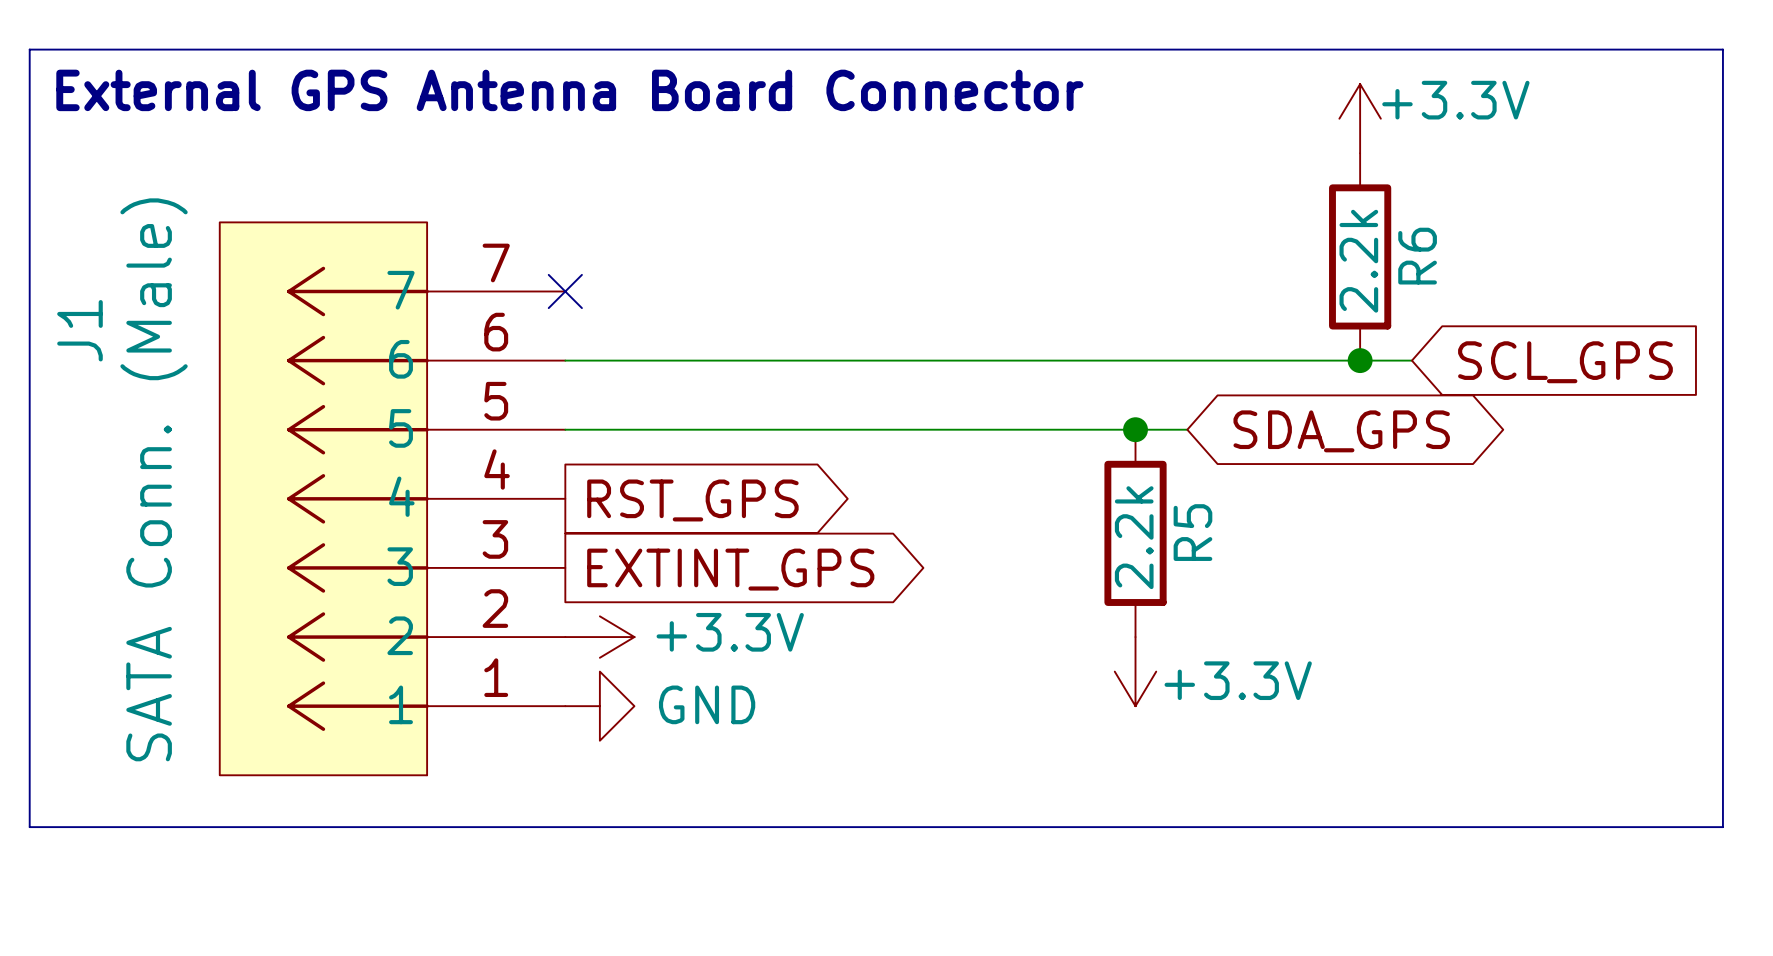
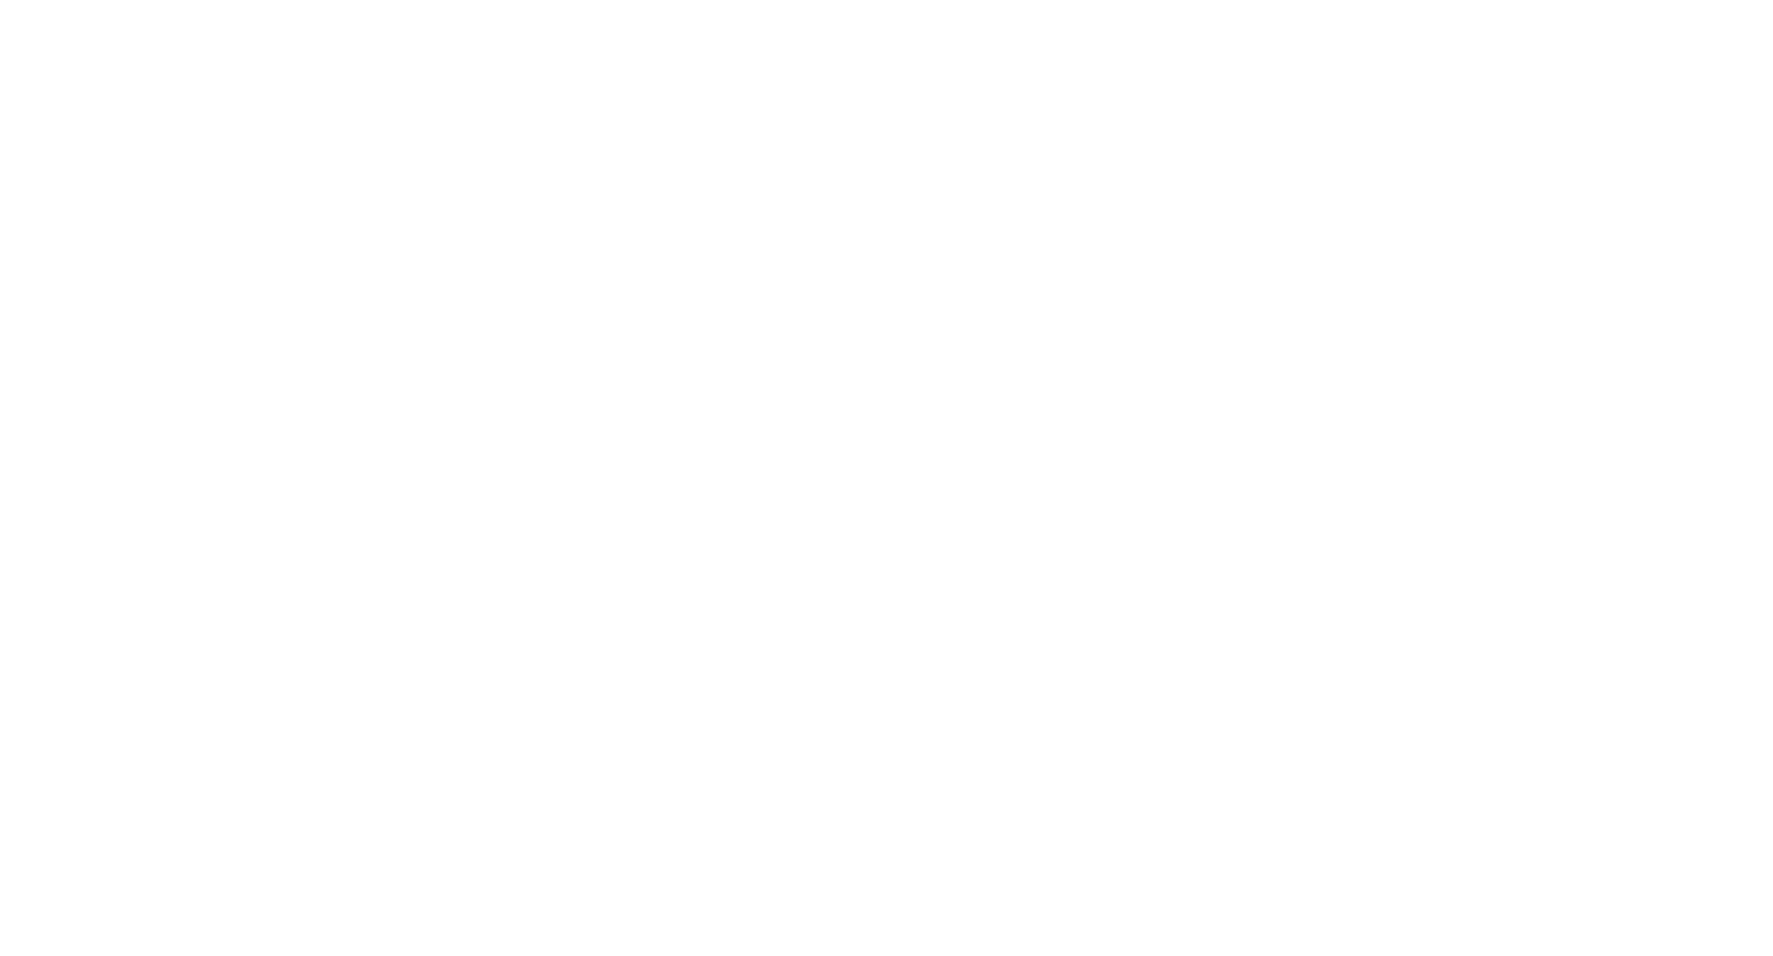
line: (29, 49) (29, 827) (1722, 827) (1722, 49) (29, 49) -> none
text: External GPS Antenna Board Connector (569, 90) -> none
power symbol: +3.3V (1360, 118) -> none
R6: 2.2k (1360, 256) -> none
no-connect mark: (565, 291) -> none
wire: (565, 360) (1411, 360) -> none
junction: (1360, 360) -> none
global label: SCL_GPS (1565, 362) -> none
wire: (565, 429) (1187, 429) -> none
junction: (1135, 429) -> none
global label: SDA_GPS (1341, 431) -> none
J1: SATA Conn. (Male) (392, 498) -> none
global label: RST_GPS (692, 500) -> none
R5: 2.2k (1135, 533) -> none
global label: EXTINT_GPS (730, 569) -> none
power symbol: +3.3V (599, 637) -> none
power symbol: +3.3V (1135, 671) -> none
power symbol: GND (599, 706) -> none

